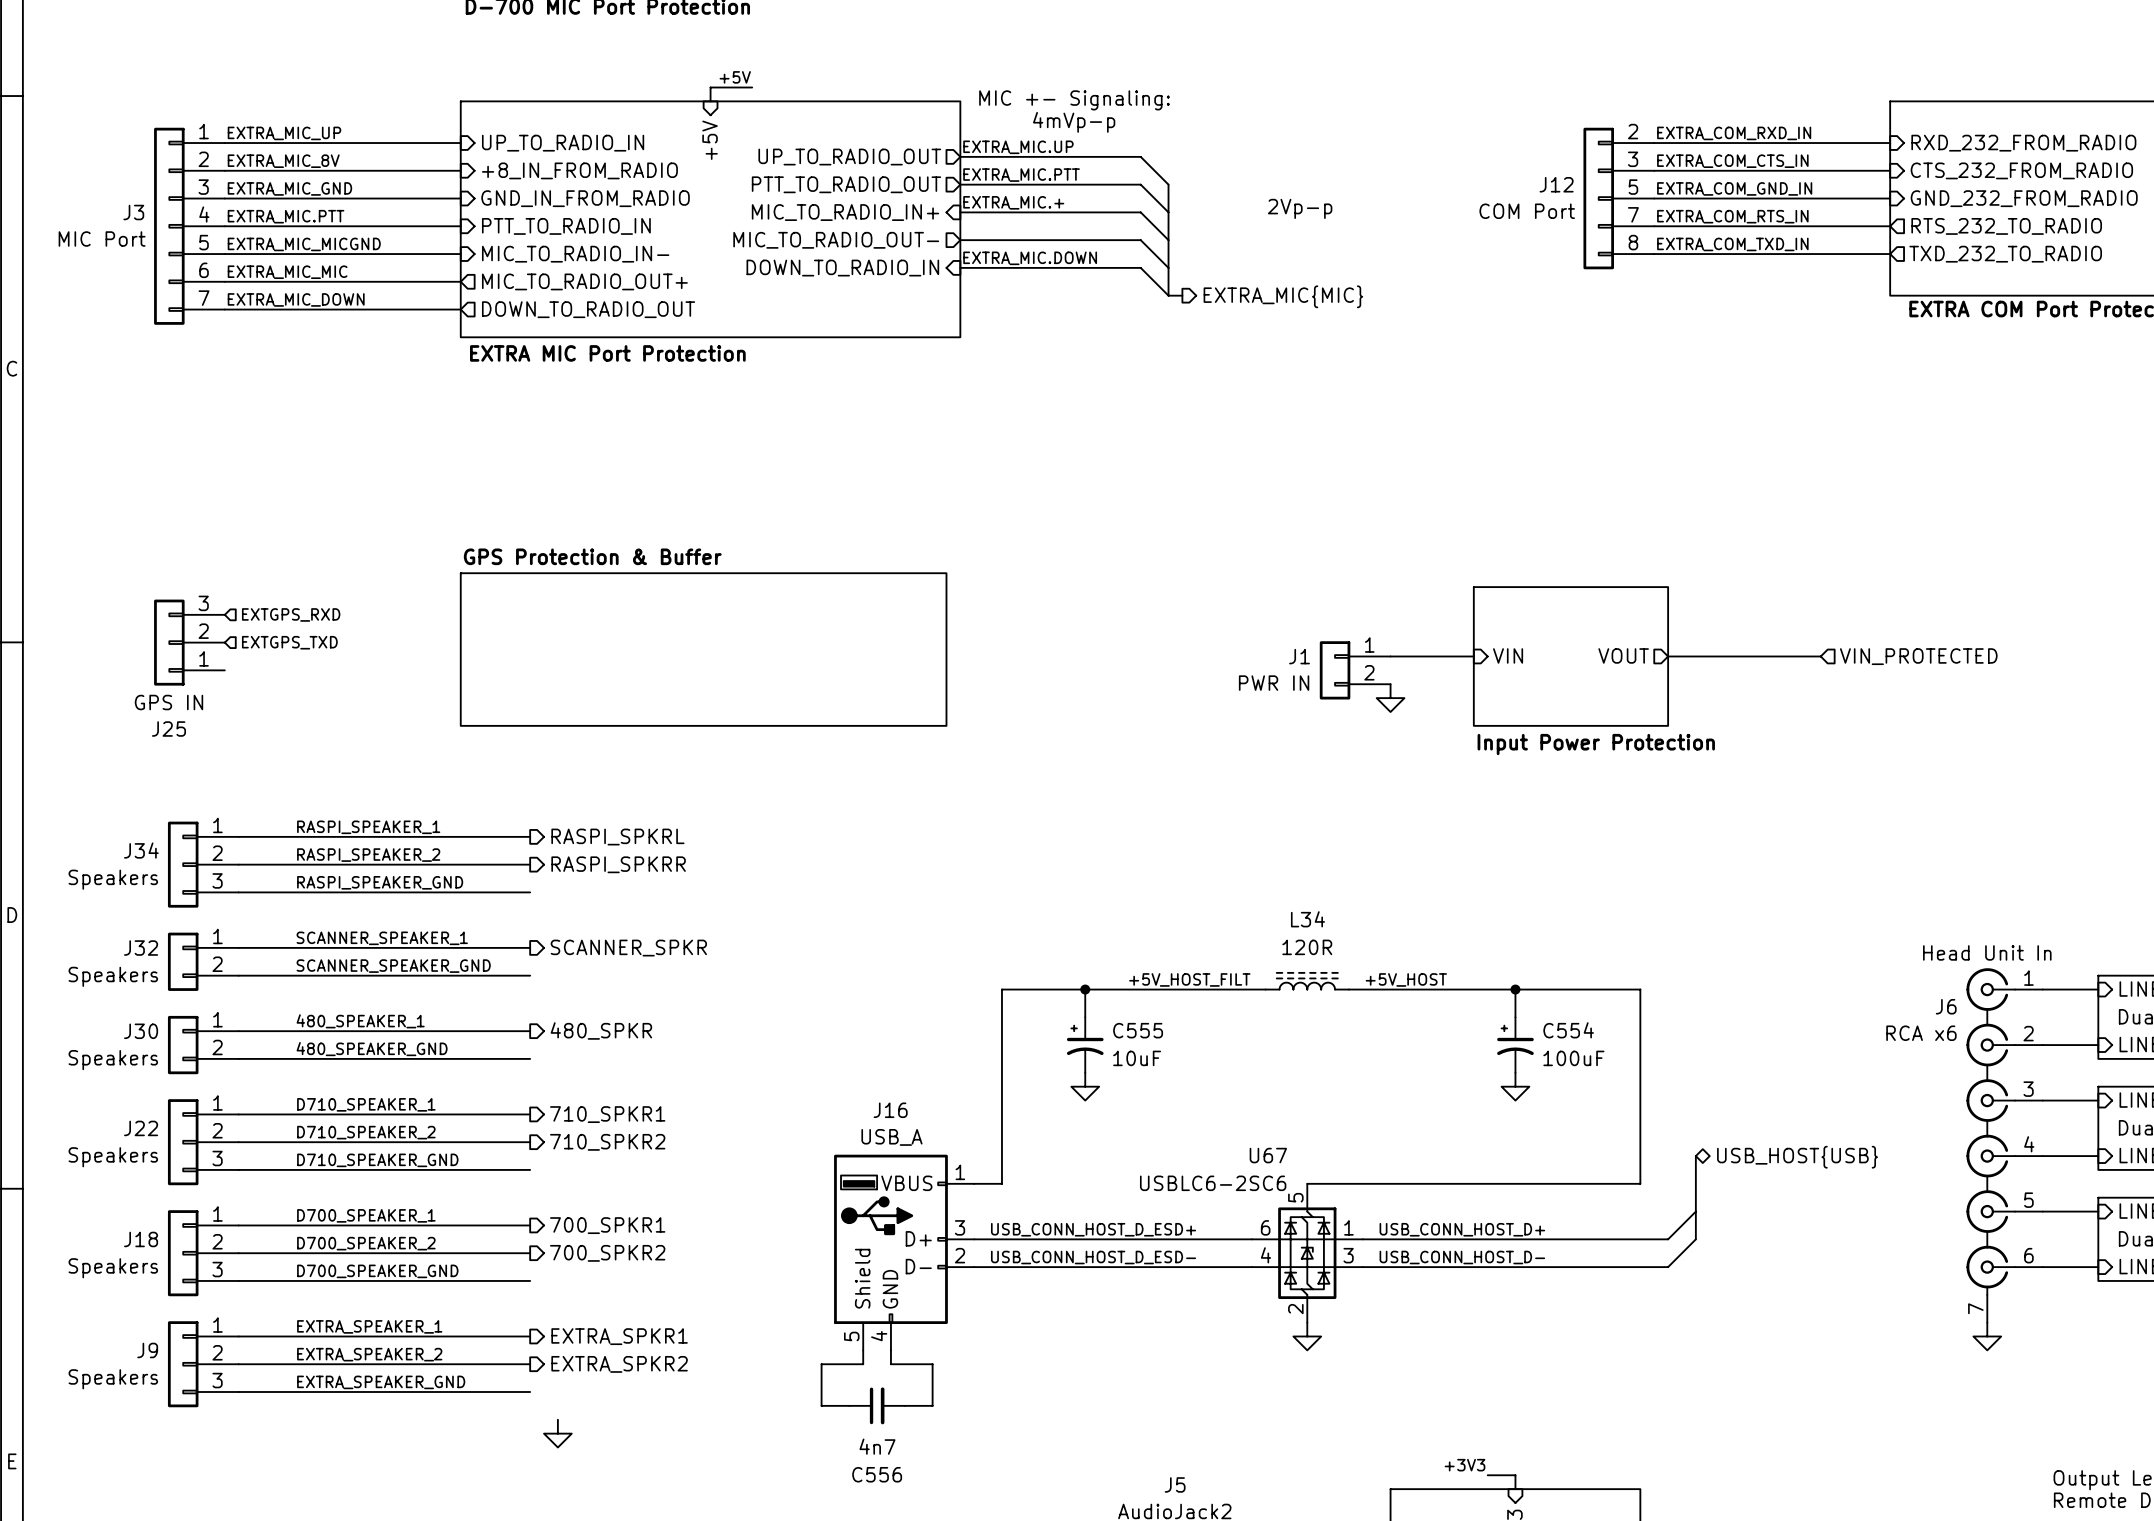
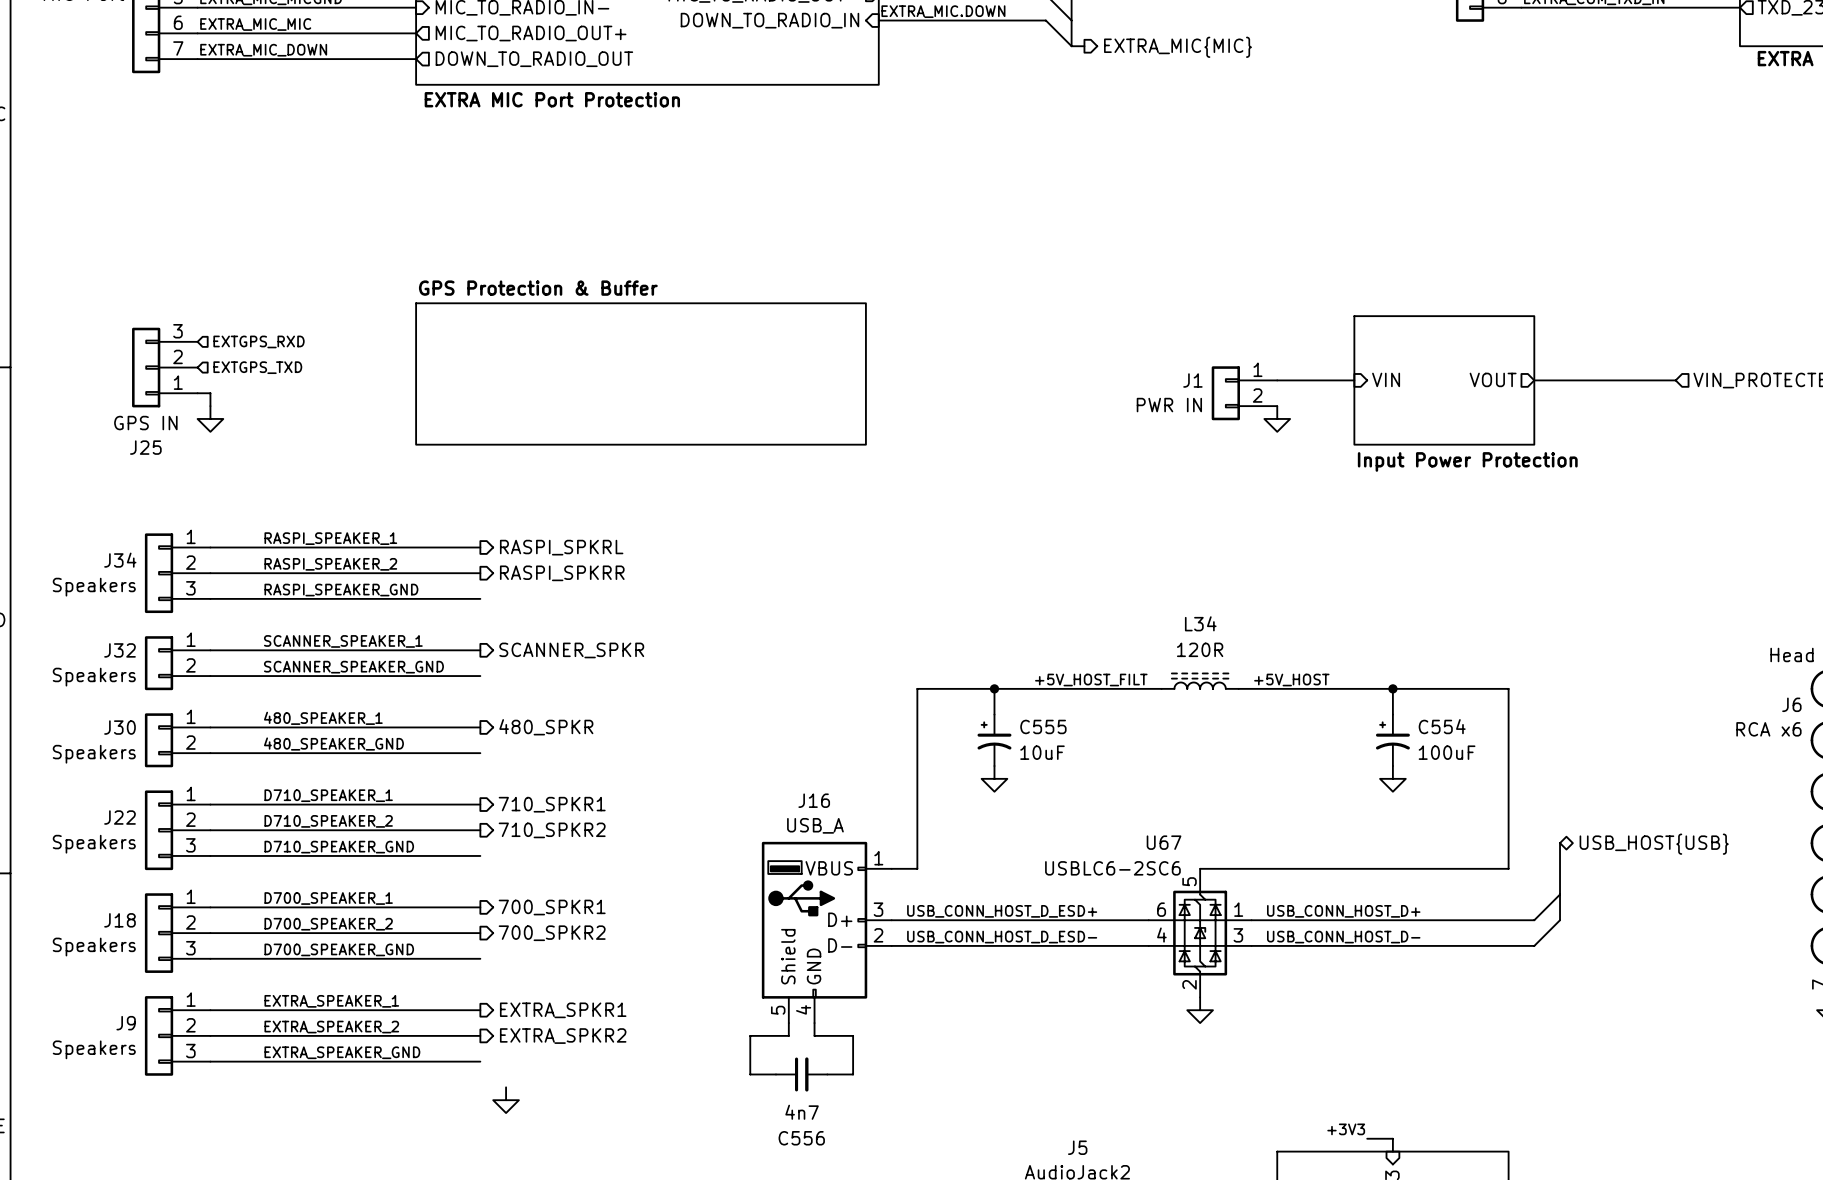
wire: none -> (197, 393) (210, 393) (210, 406)
power symbol: none -> (210, 418)

